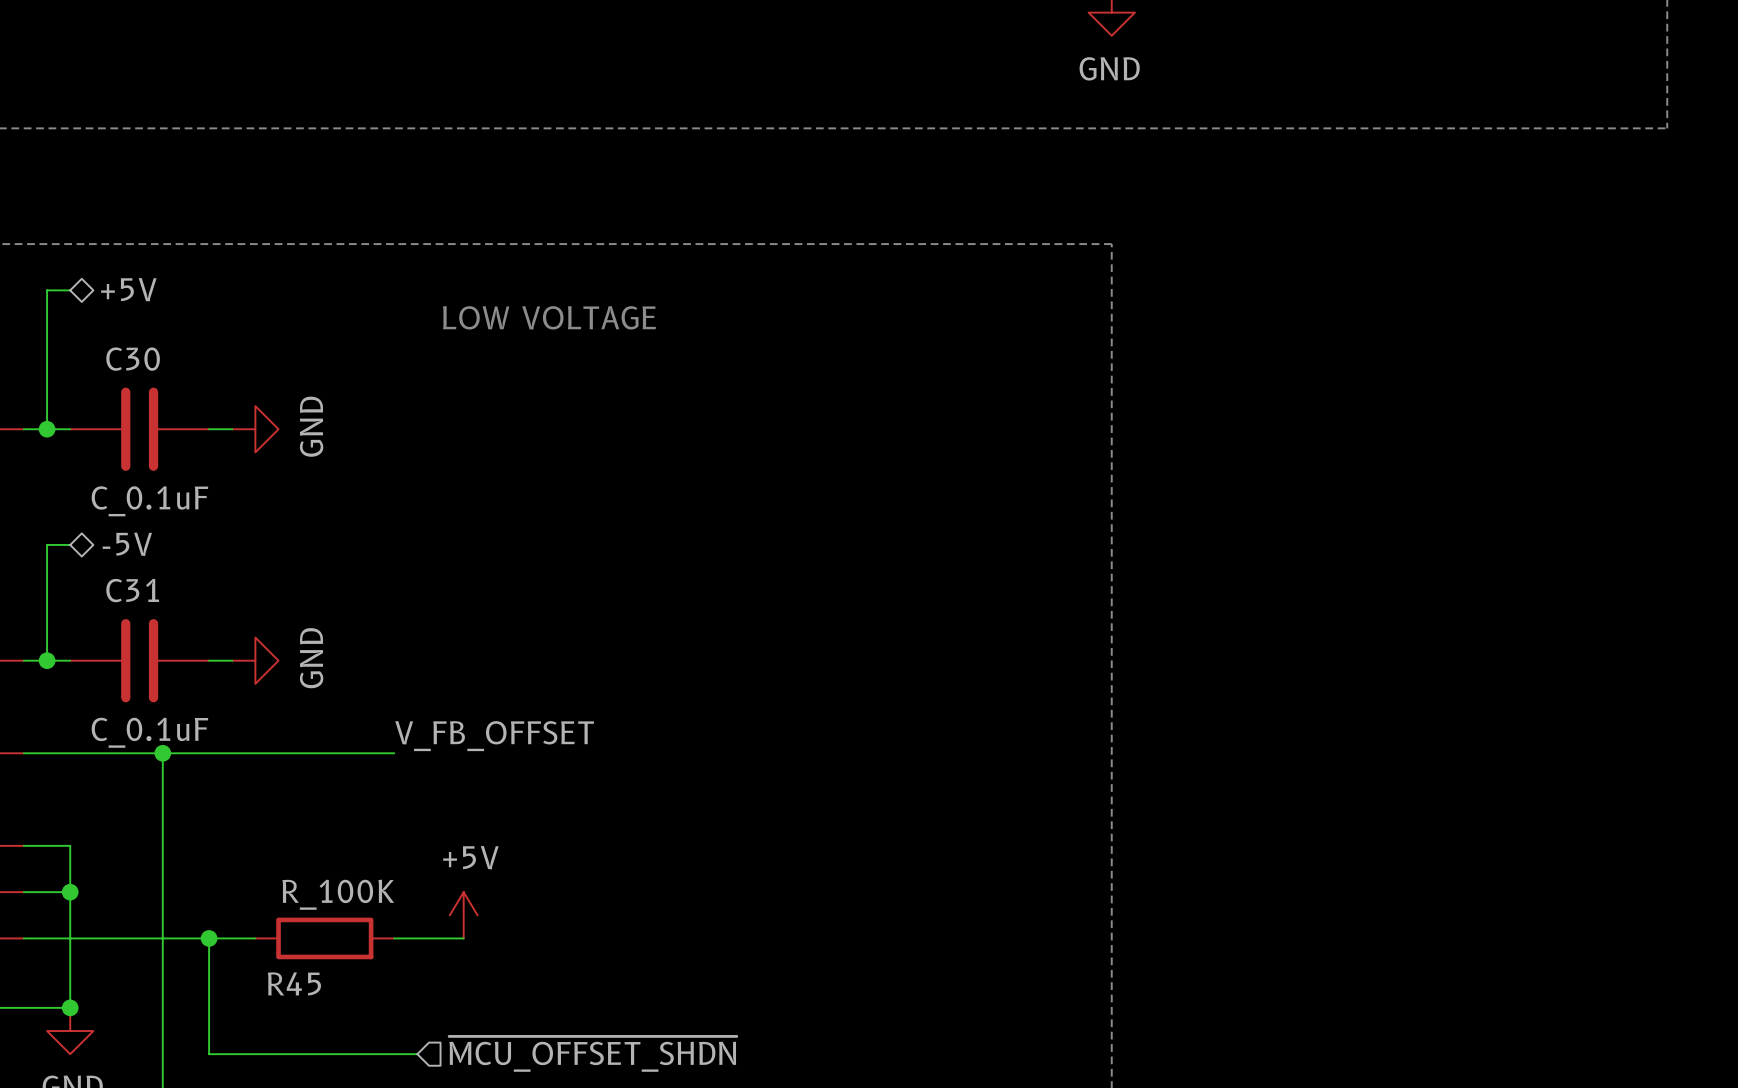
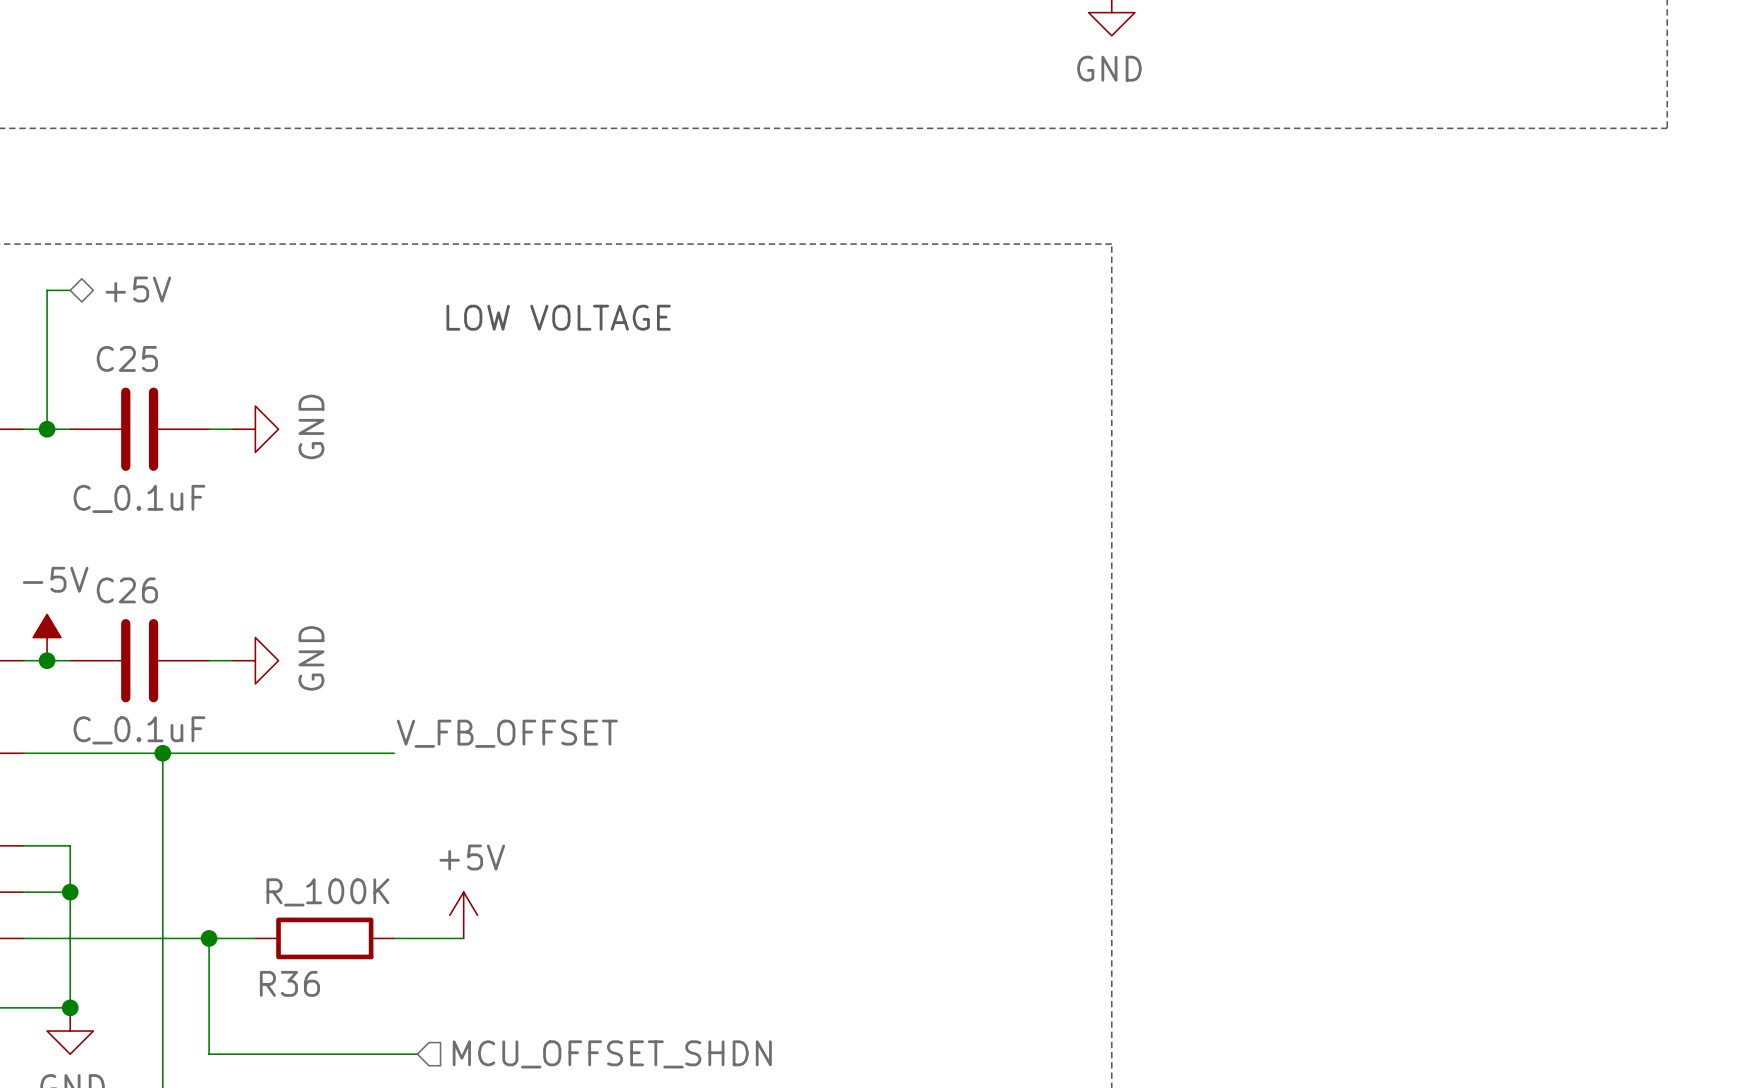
C30 name: C30 (133, 359) -> C25 (127, 358)
wire: (70, 544) (47, 544) (47, 660) -> none
hierarchical label: -5V (127, 544) -> none
C31 name: C31 (132, 590) -> C26 (127, 590)
power symbol: none -> -5V (47, 637)
R45 name: R45 (294, 983) -> R36 (289, 983)
hierarchical label: ~{MCU_OFFSET_SHDN} (592, 1054) -> MCU_OFFSET_SHDN (612, 1054)

